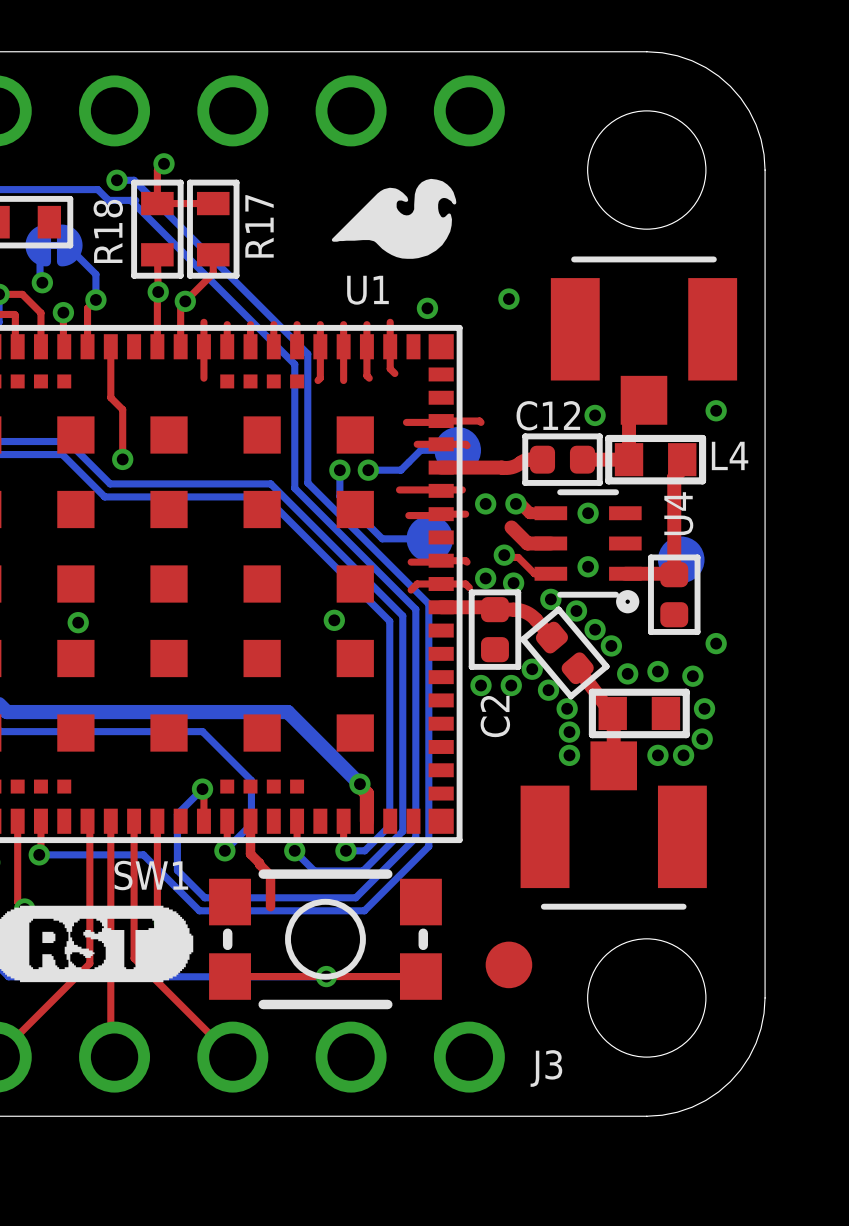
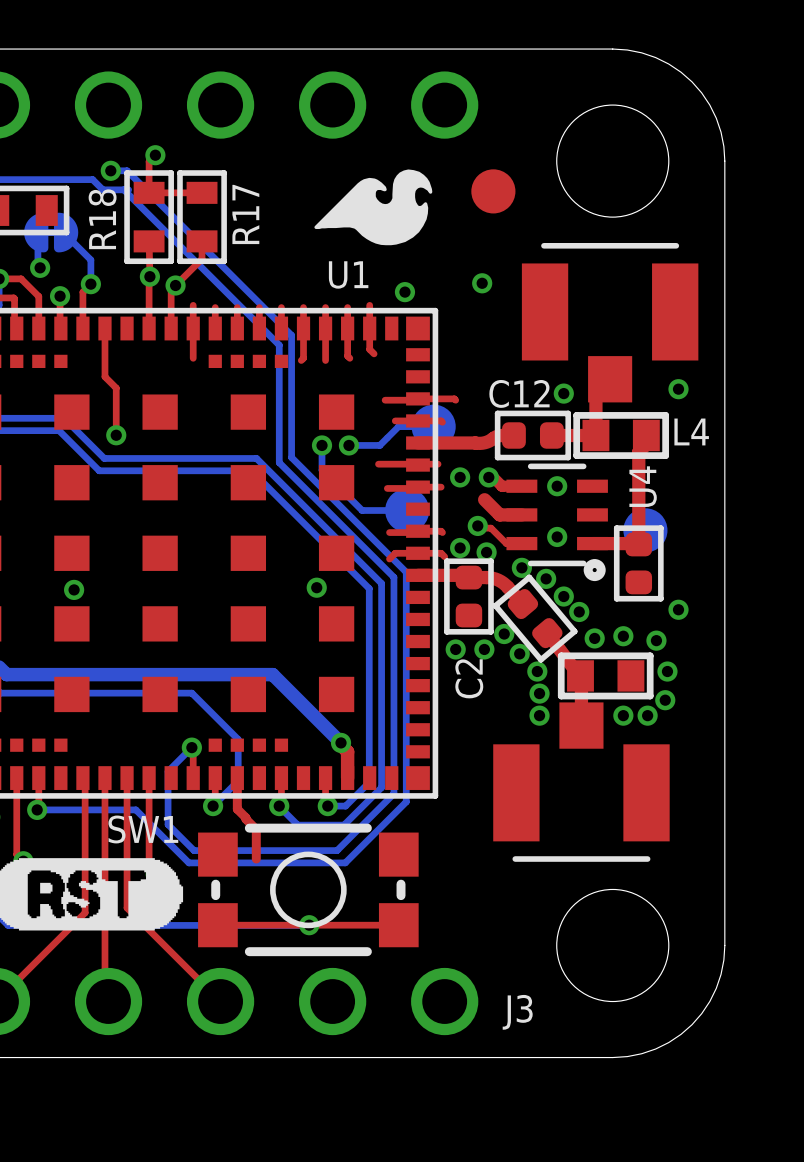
part position: (508, 964) -> (493, 191)

